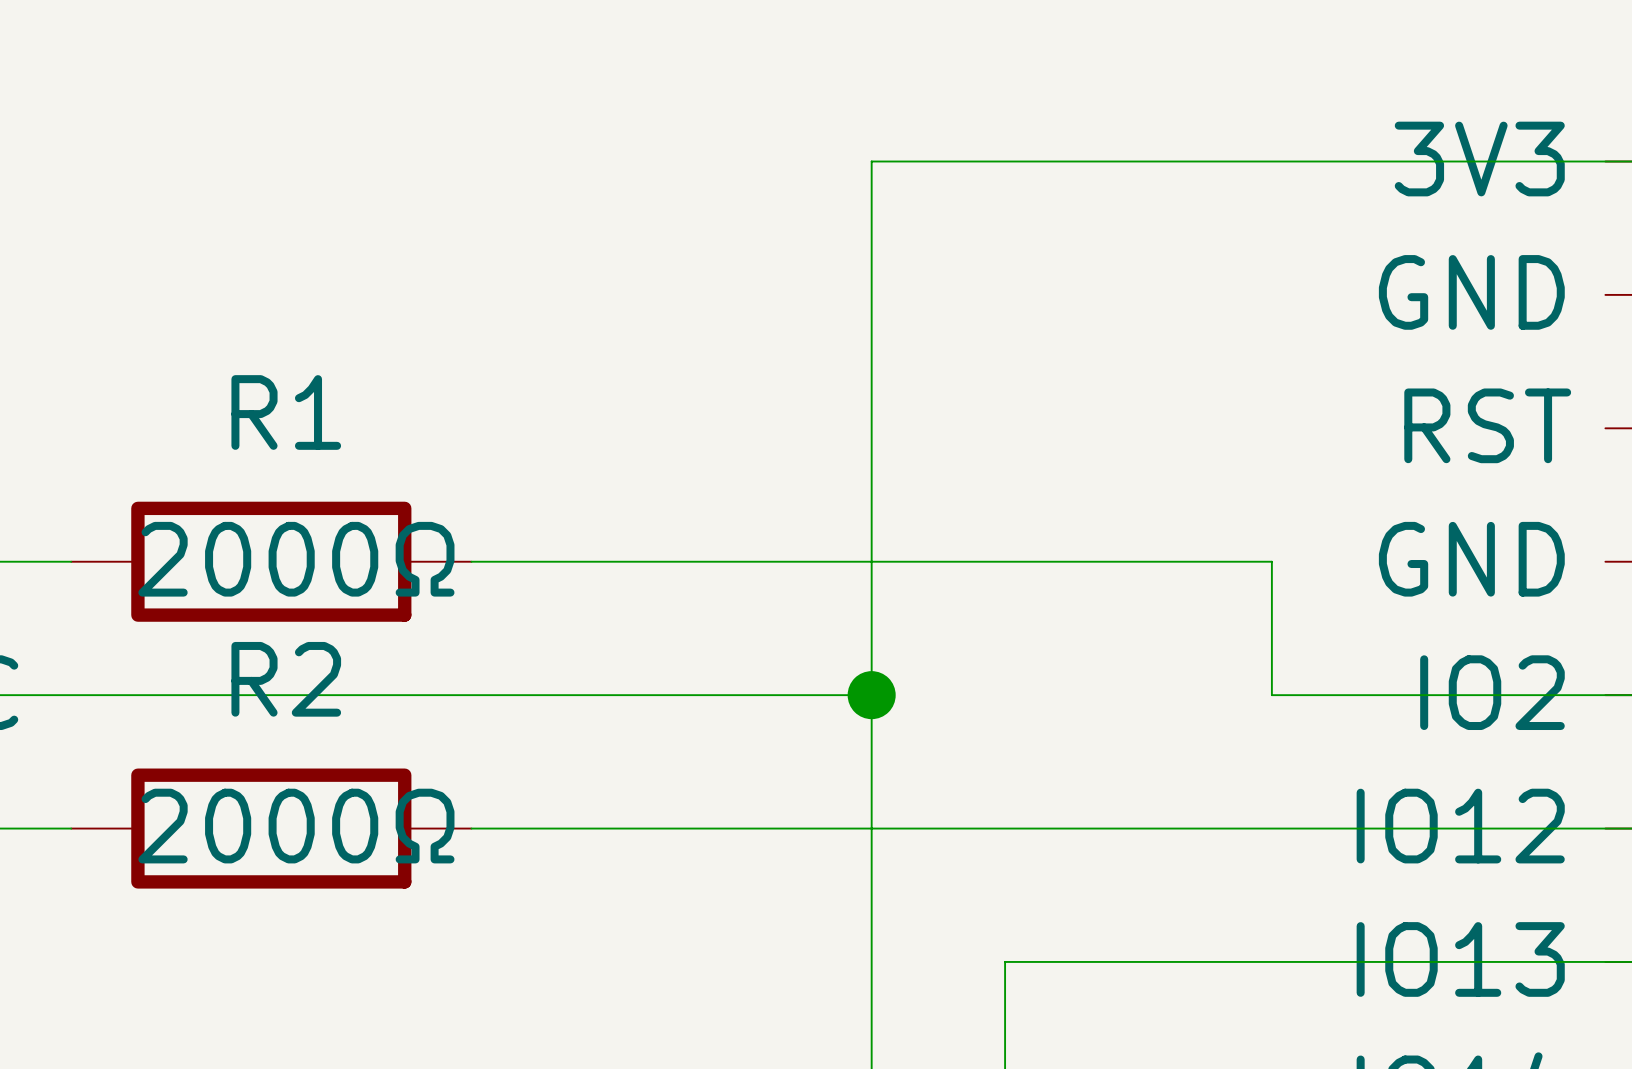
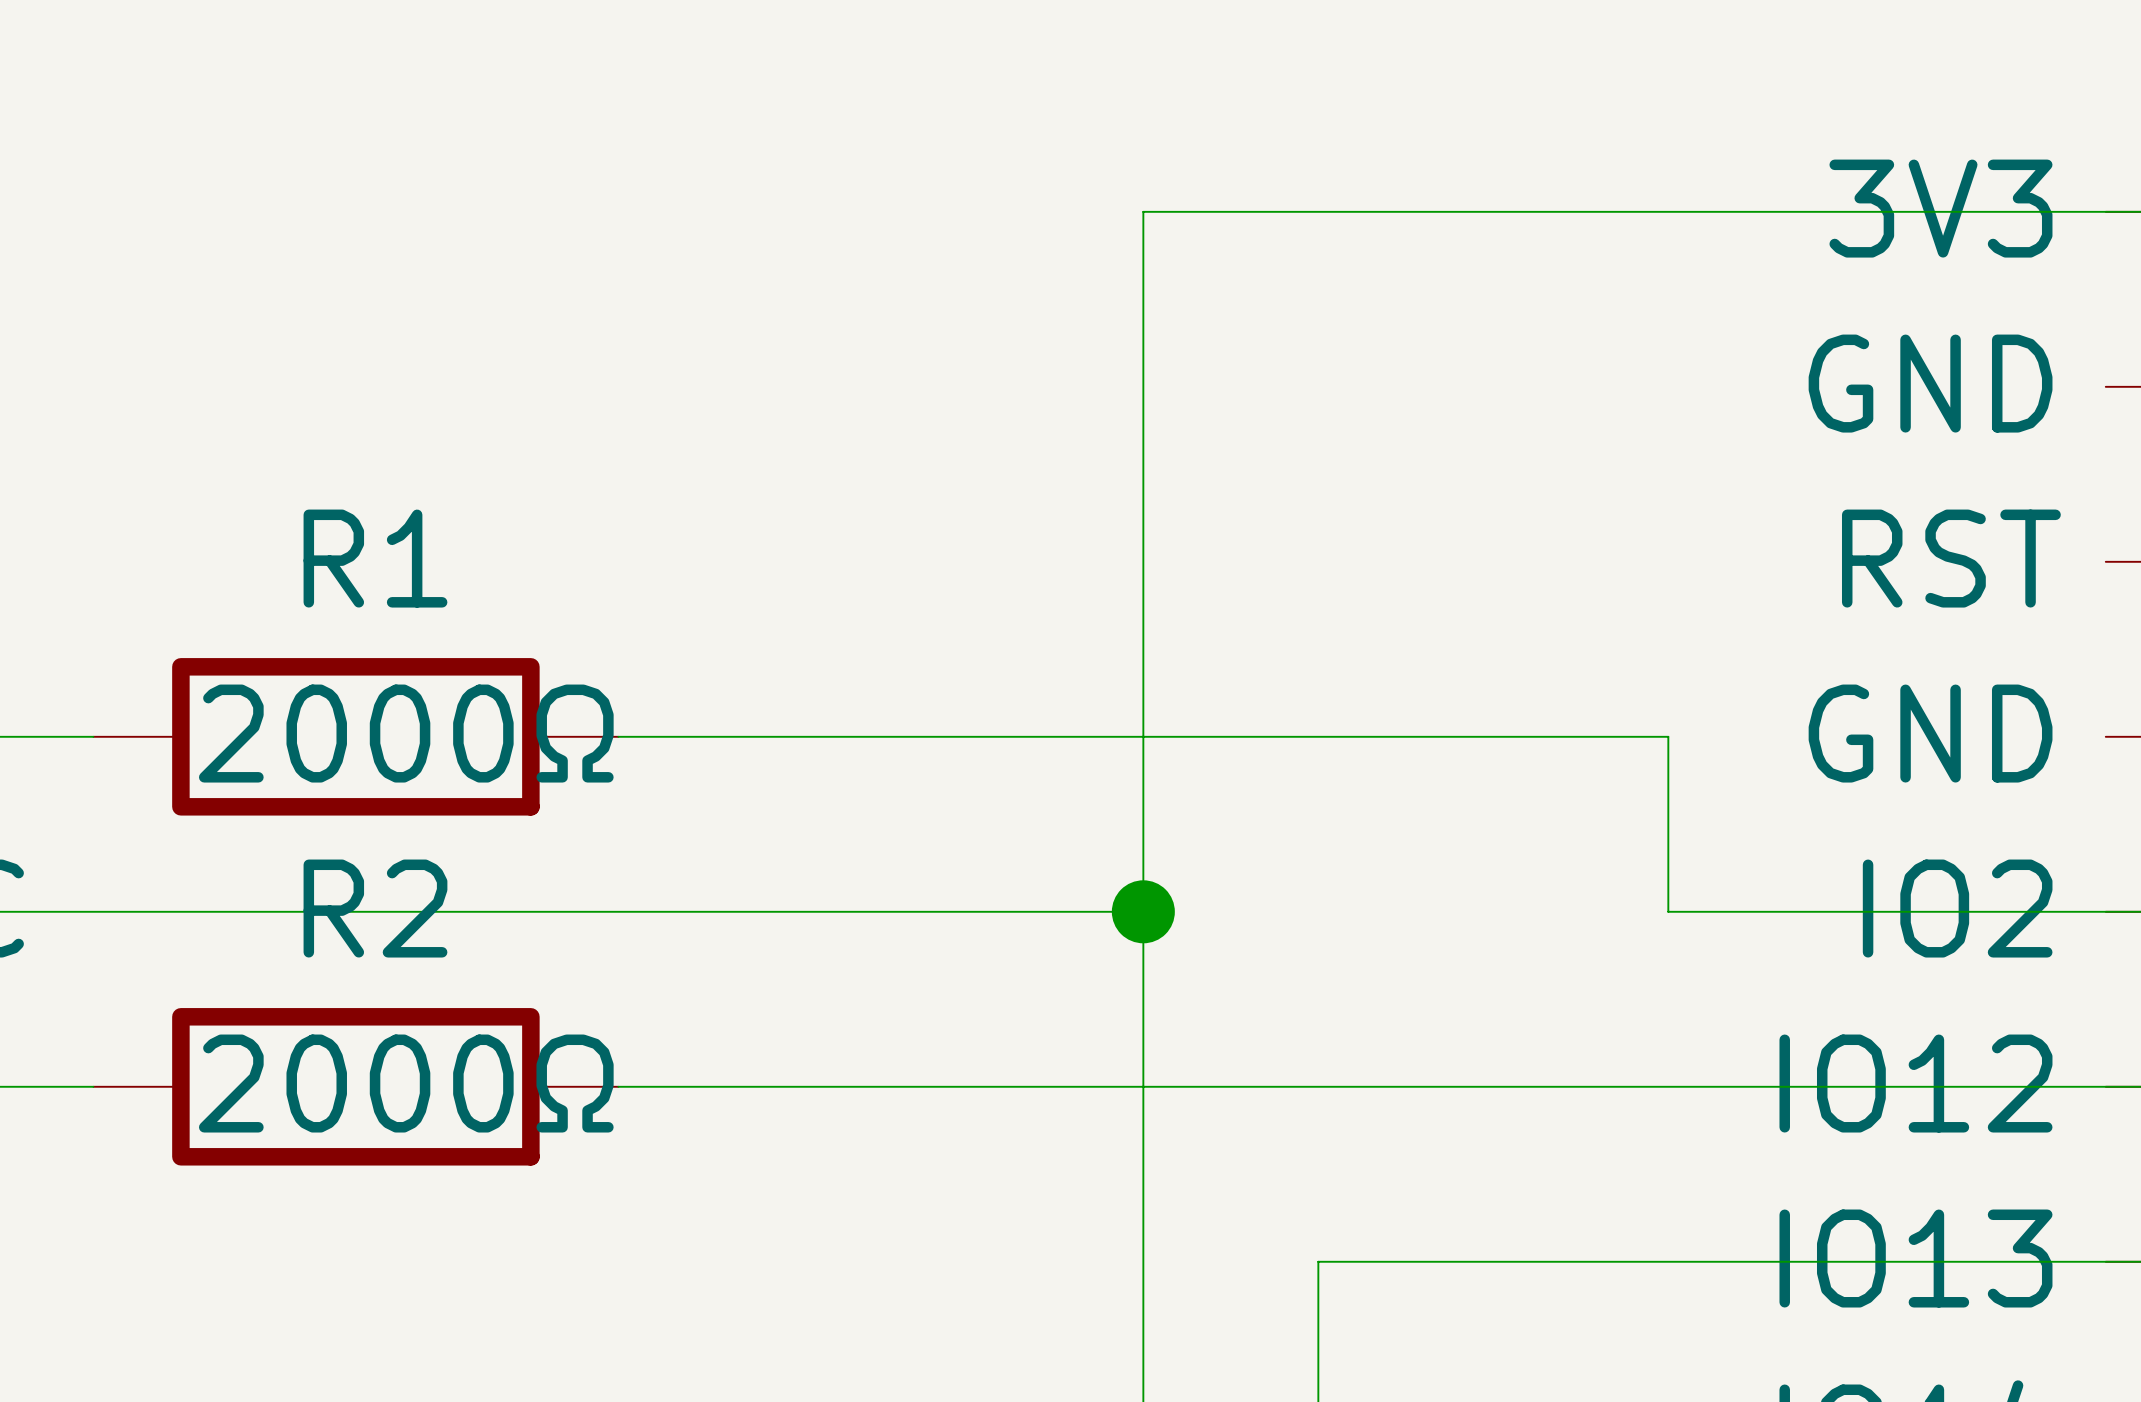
R1 name position: R1 (286, 412) -> R1 (375, 558)
R1 value position: 2000Ω (296, 559) -> 2000Ω (406, 733)
R2 name position: R2 (286, 679) -> R2 (375, 908)
R2 value position: 2000Ω (296, 826) -> 2000Ω (406, 1083)

